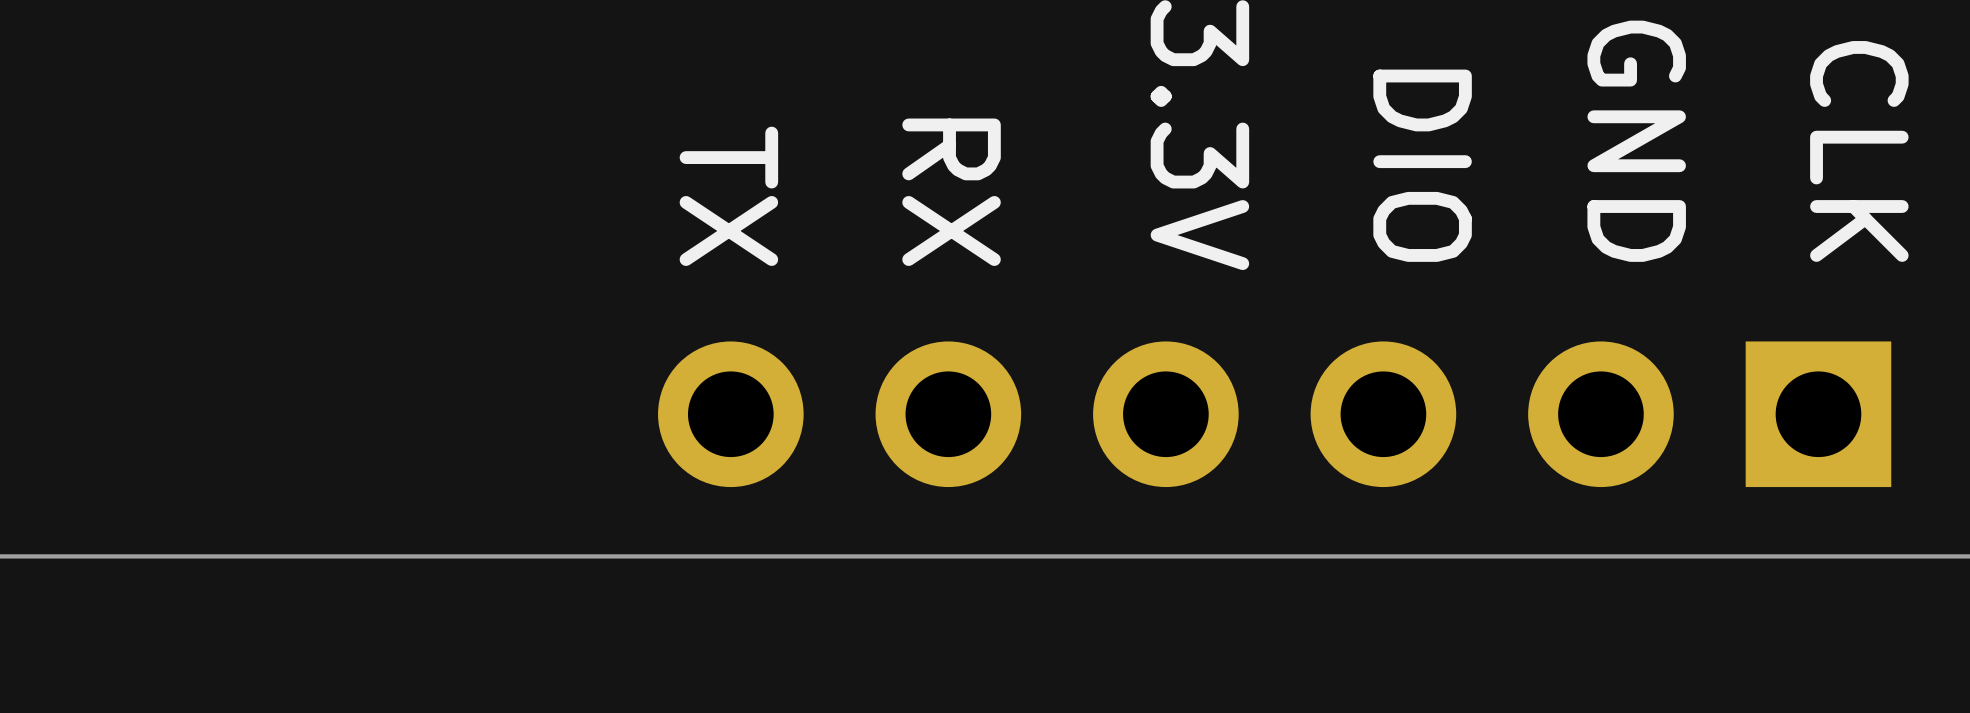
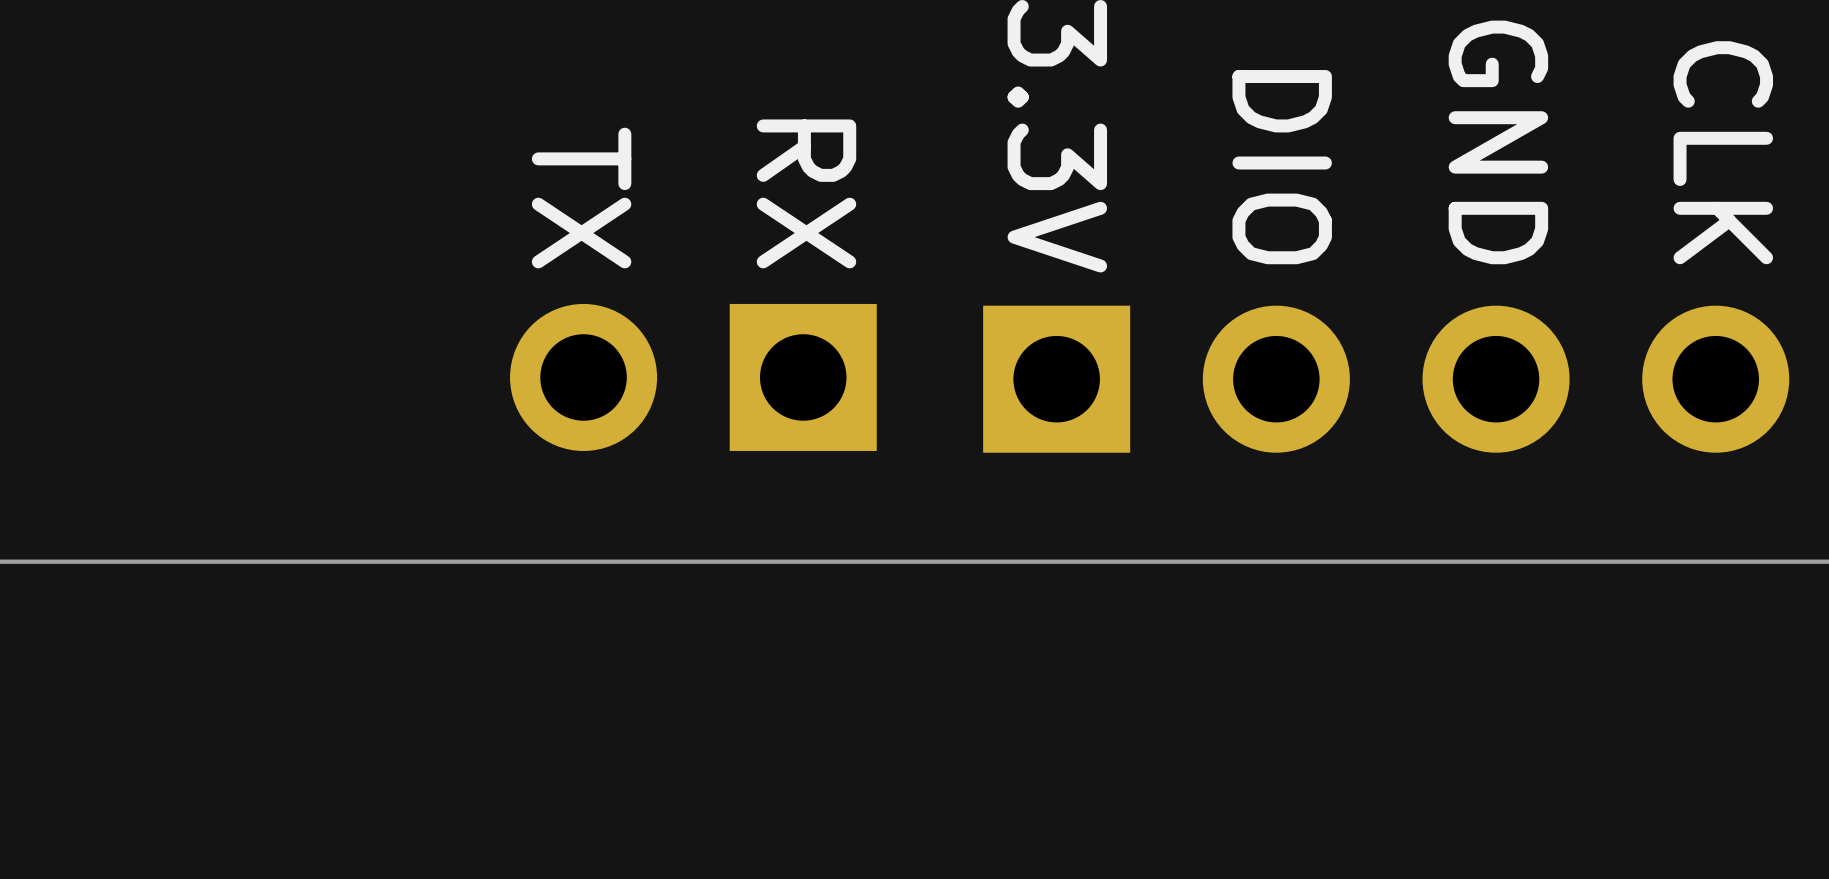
part: none -> (693, 377)
part: none -> (1386, 379)
part: (1274, 414) -> none

